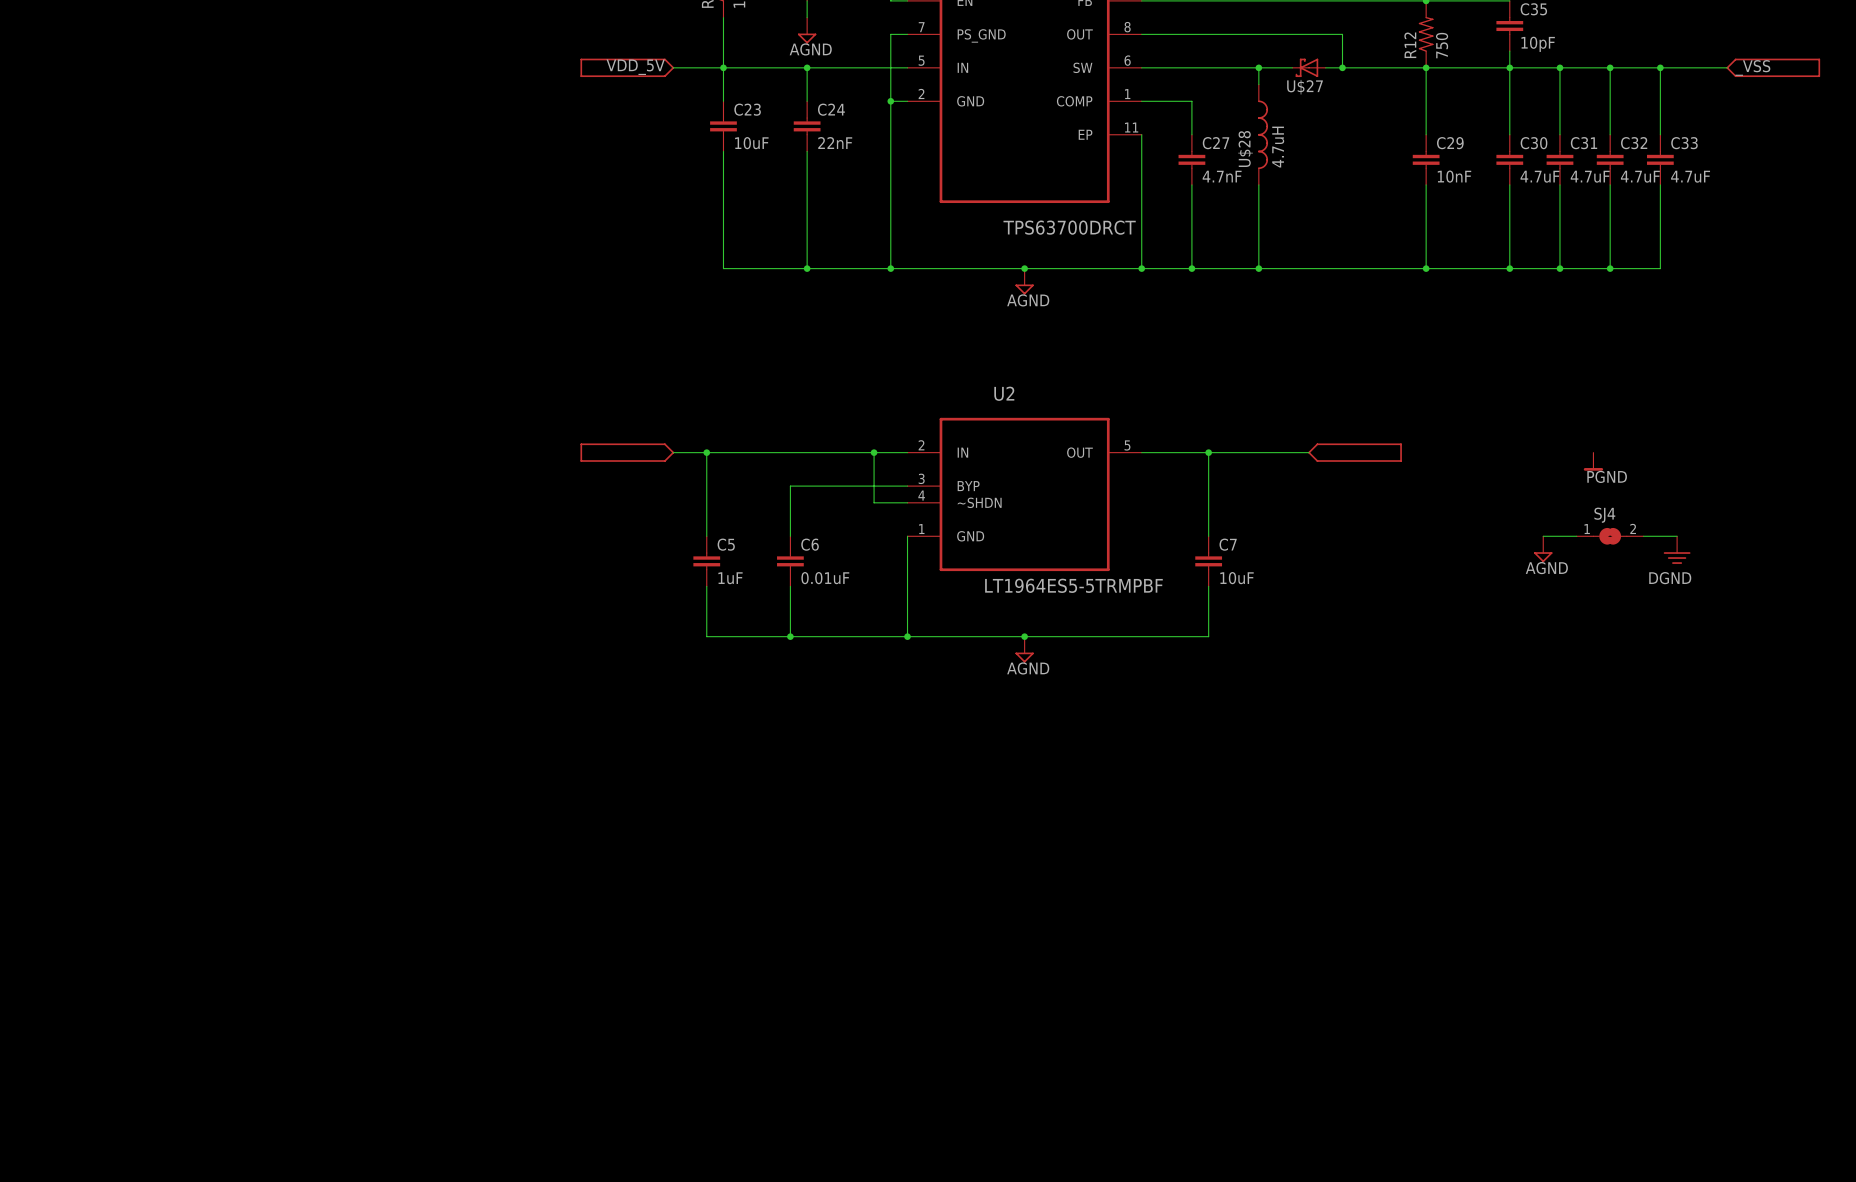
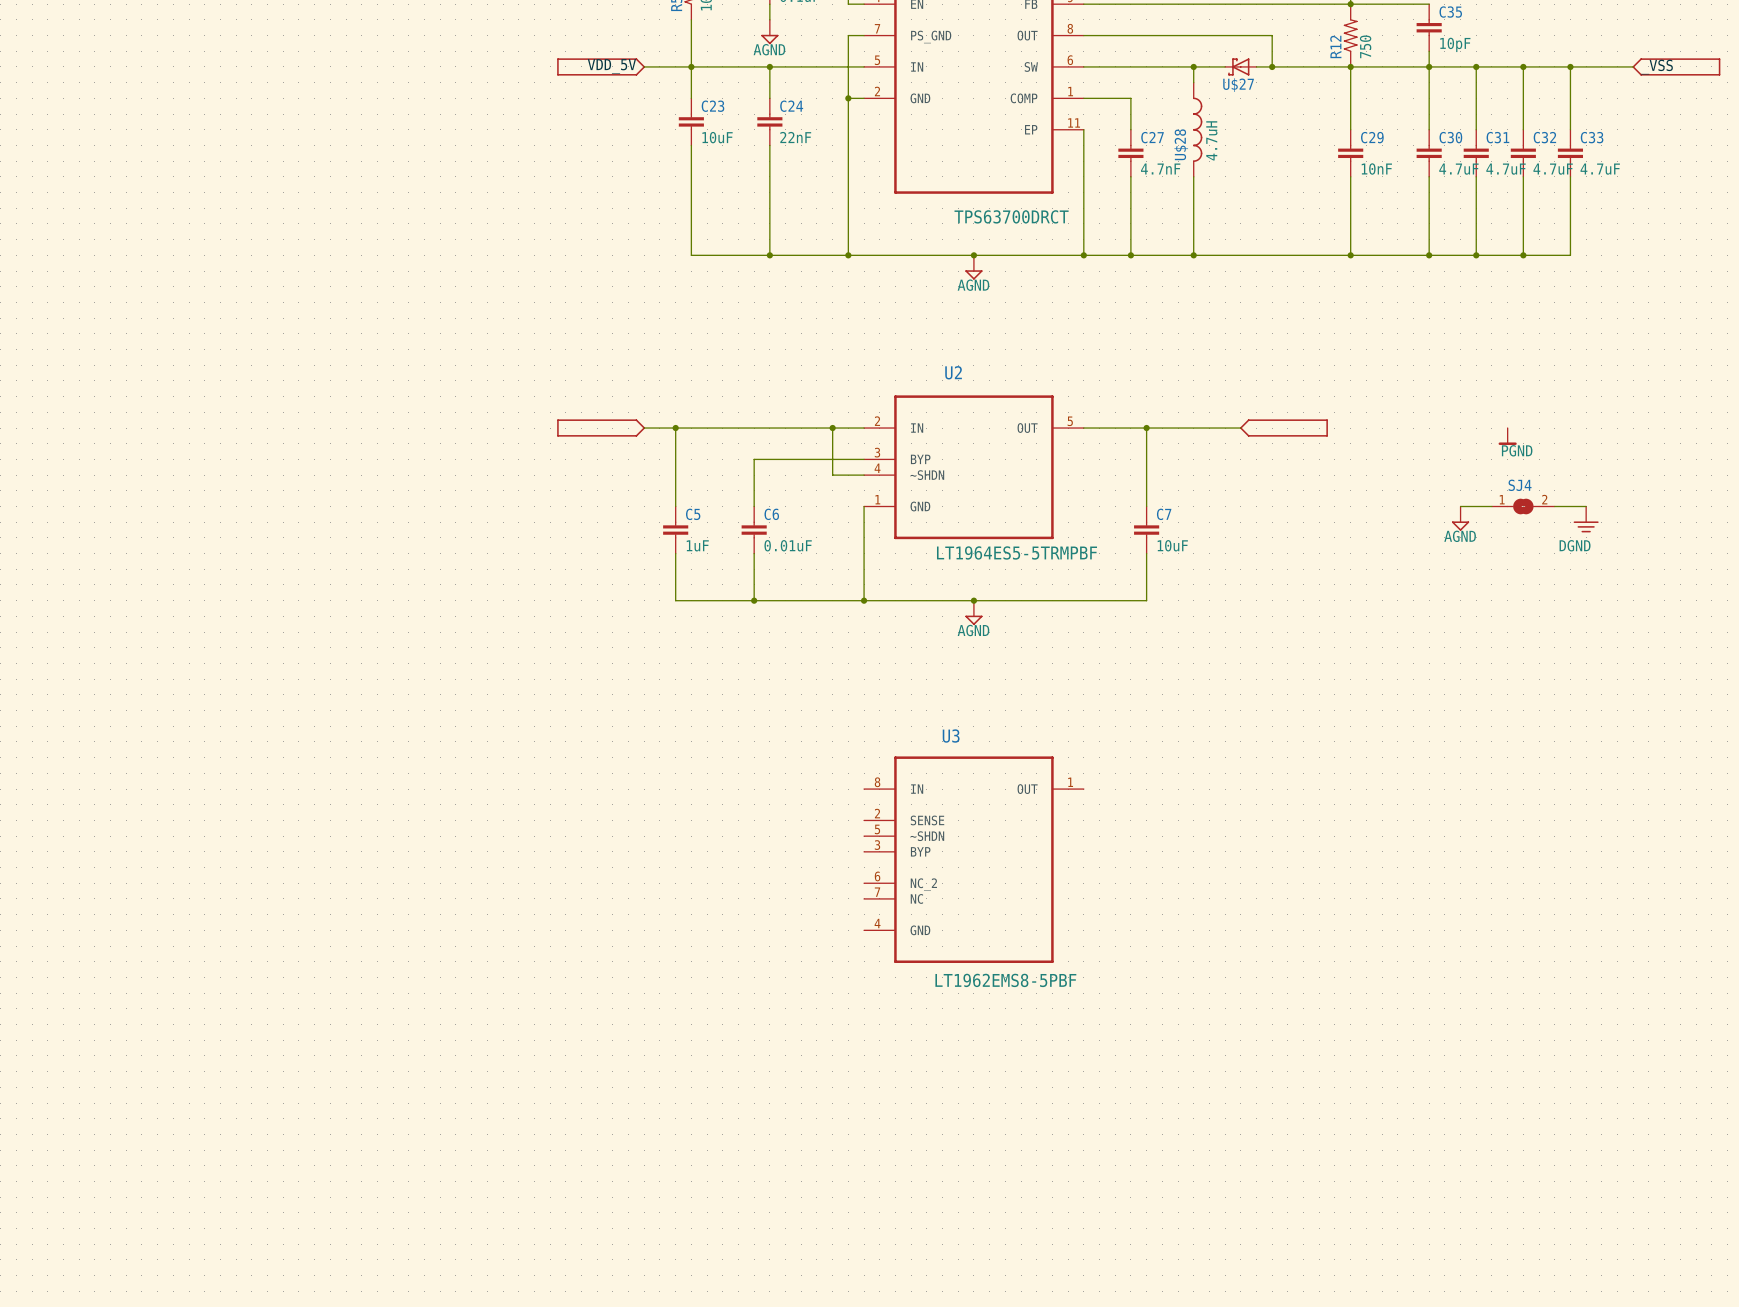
U3: none -> LT1962EMS8-5PBF (973, 859)

